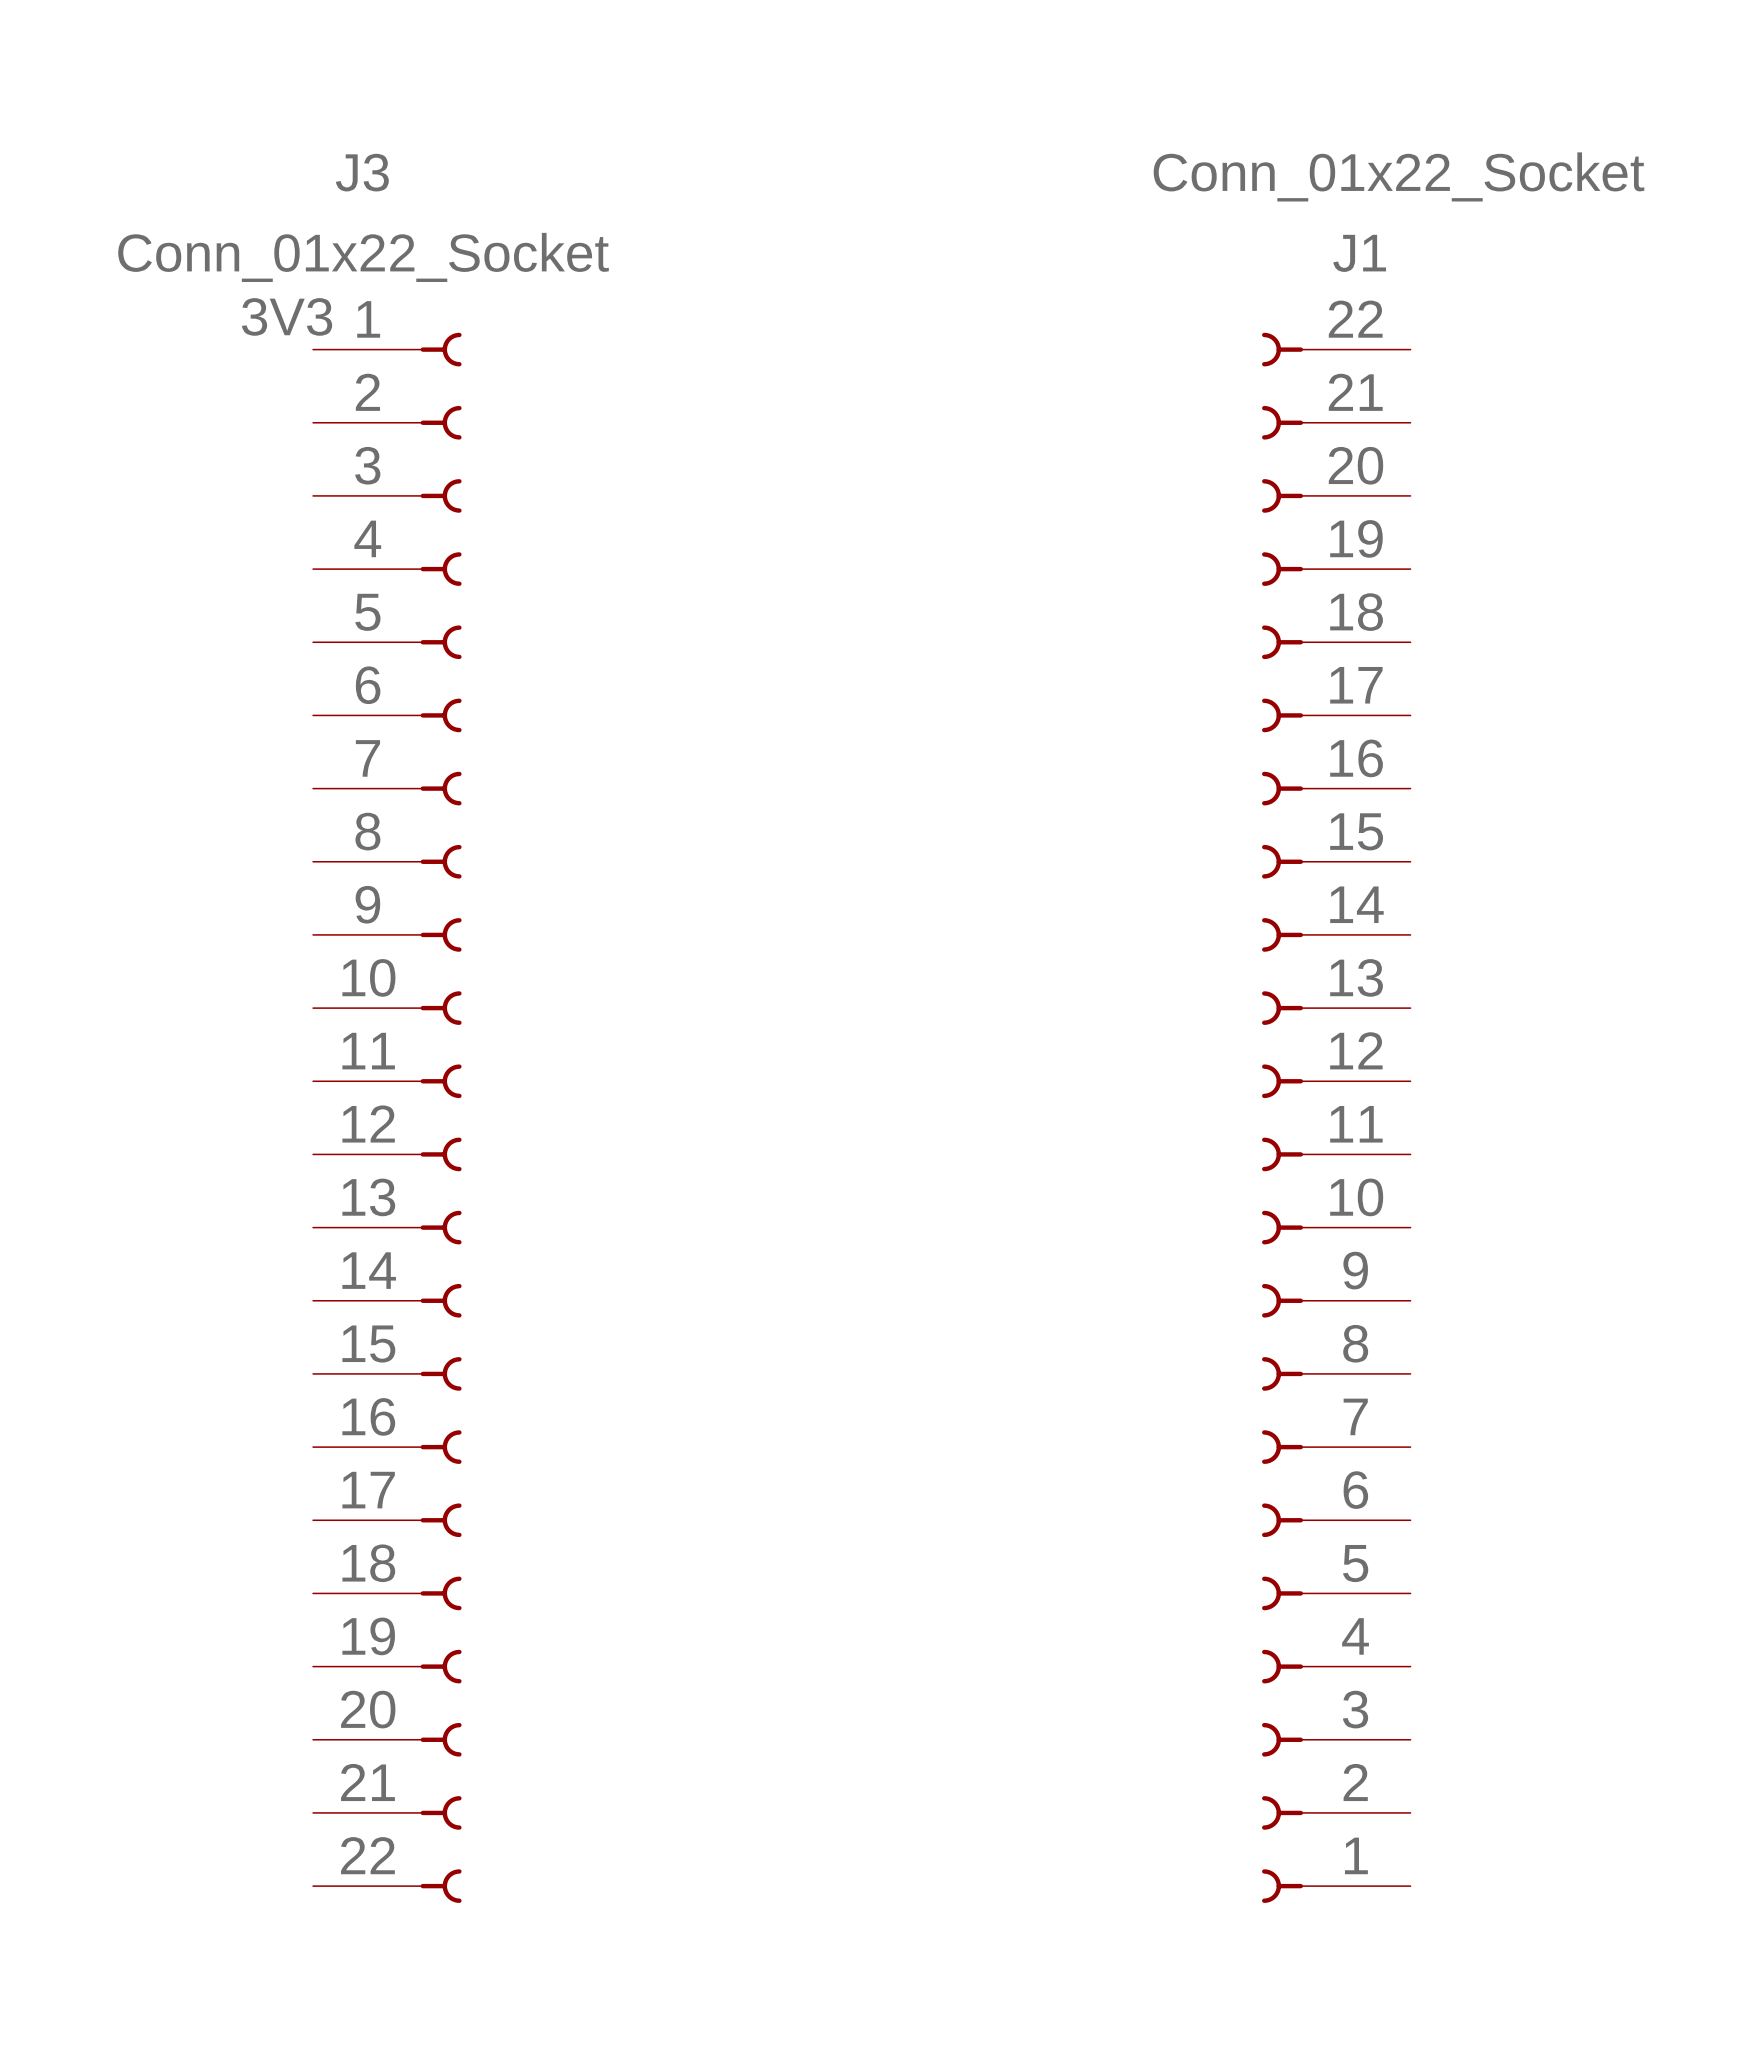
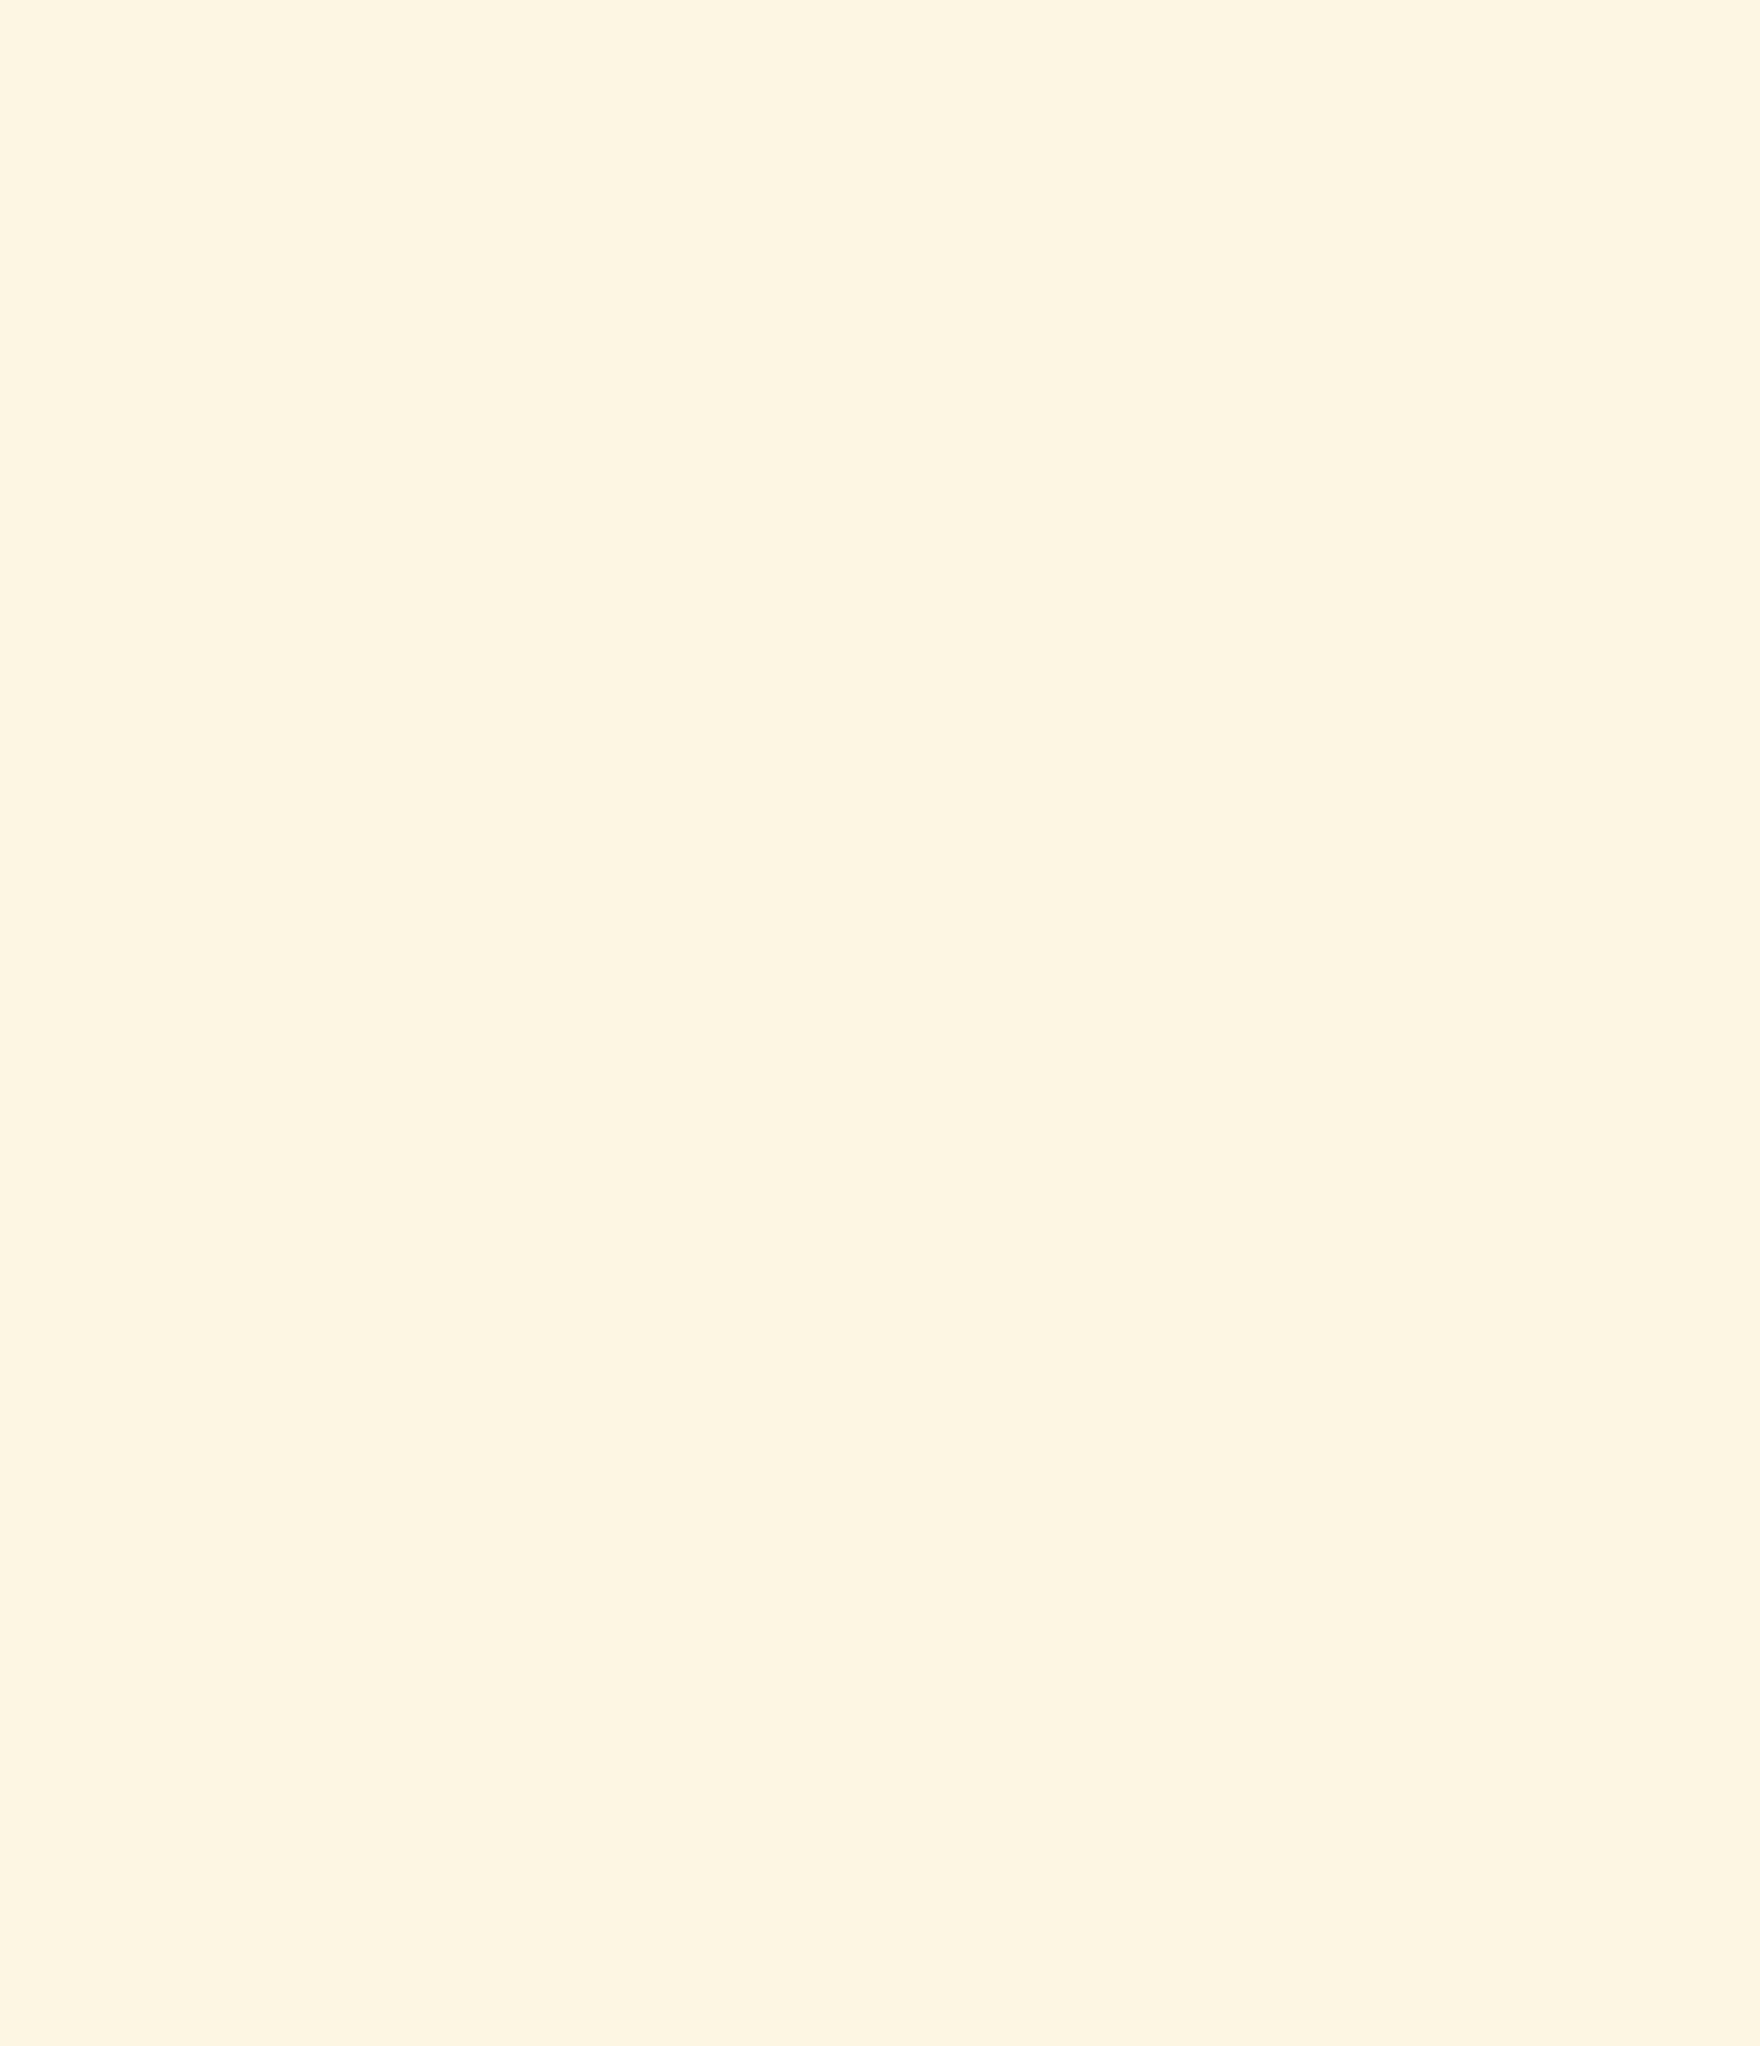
label: 3V3 (287, 316) -> none
J3: Conn_01x22_Socket (387, 1117) -> none
J1: Conn_01x22_Socket (1336, 1117) -> none

